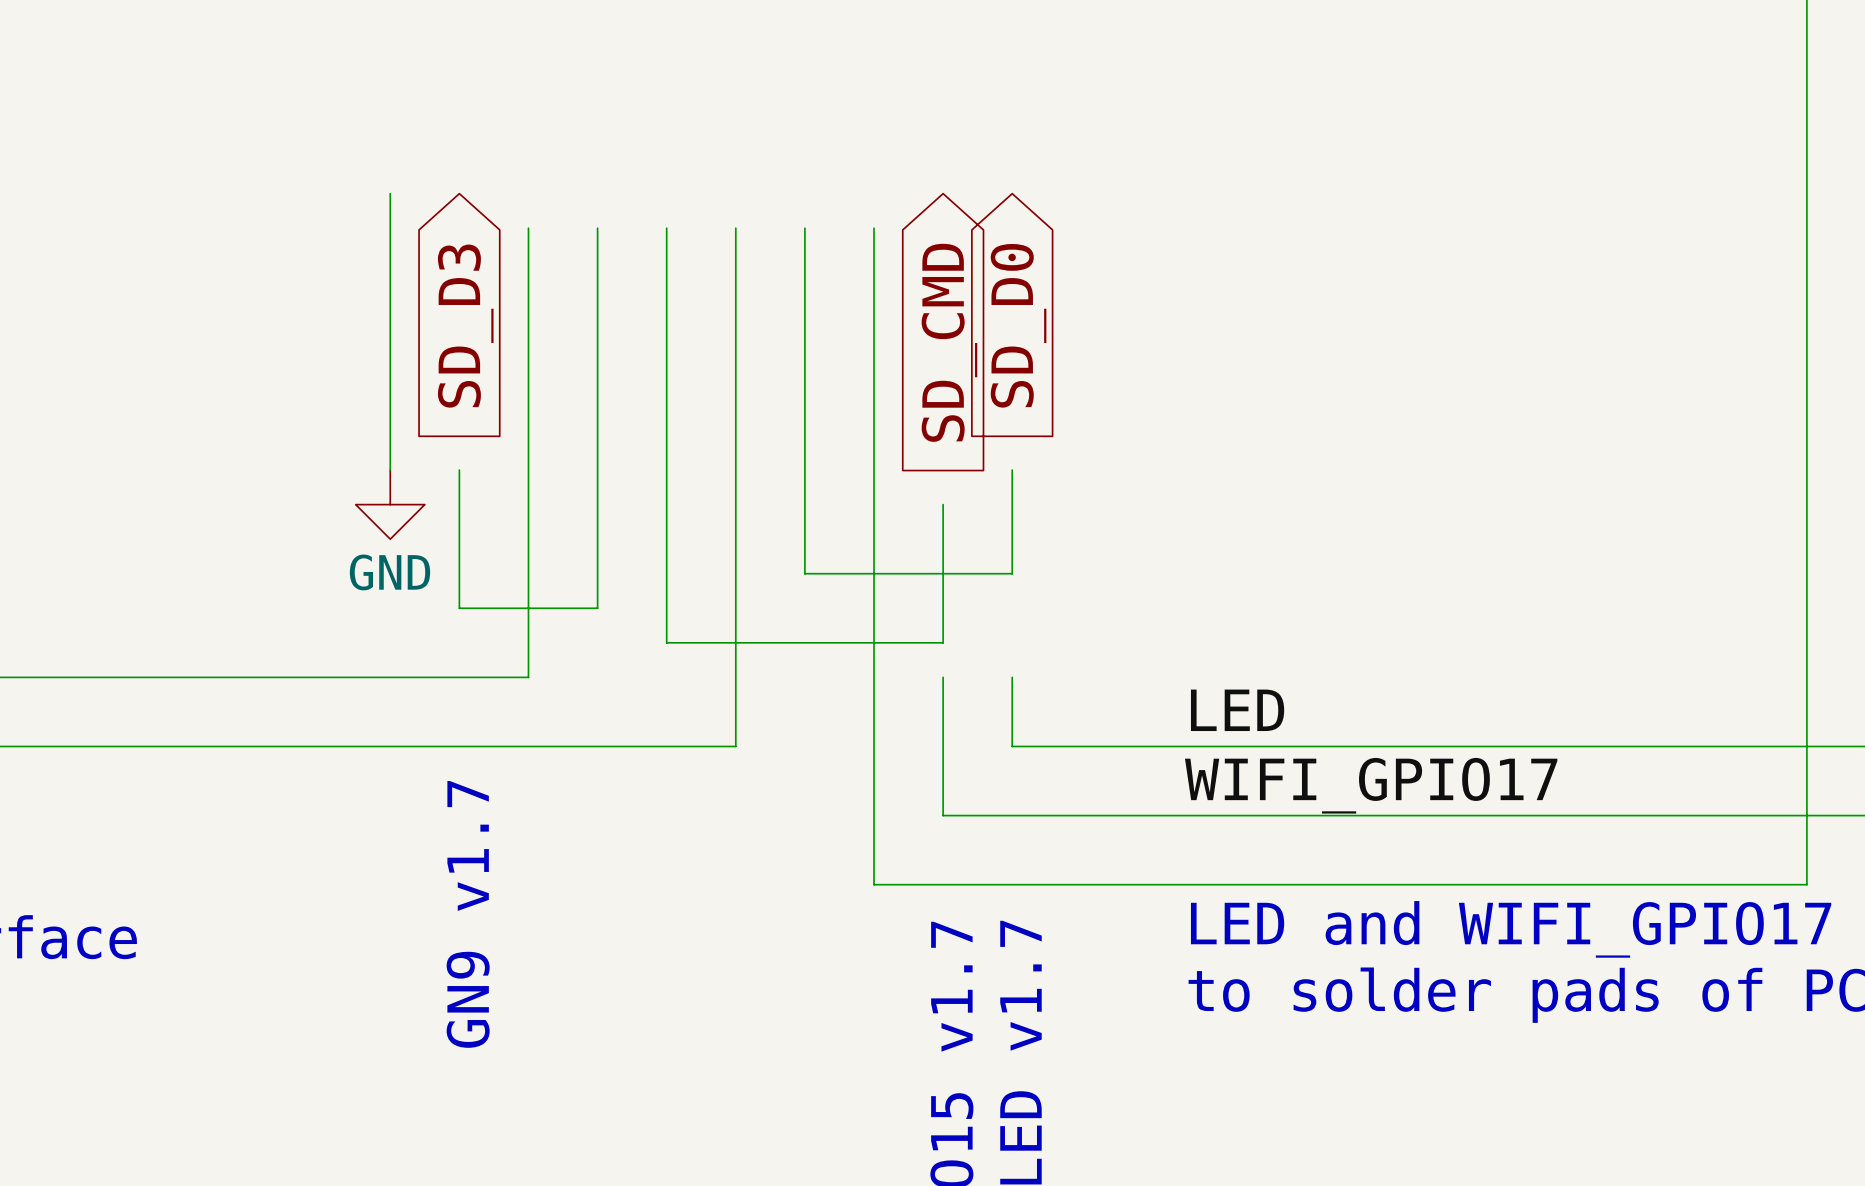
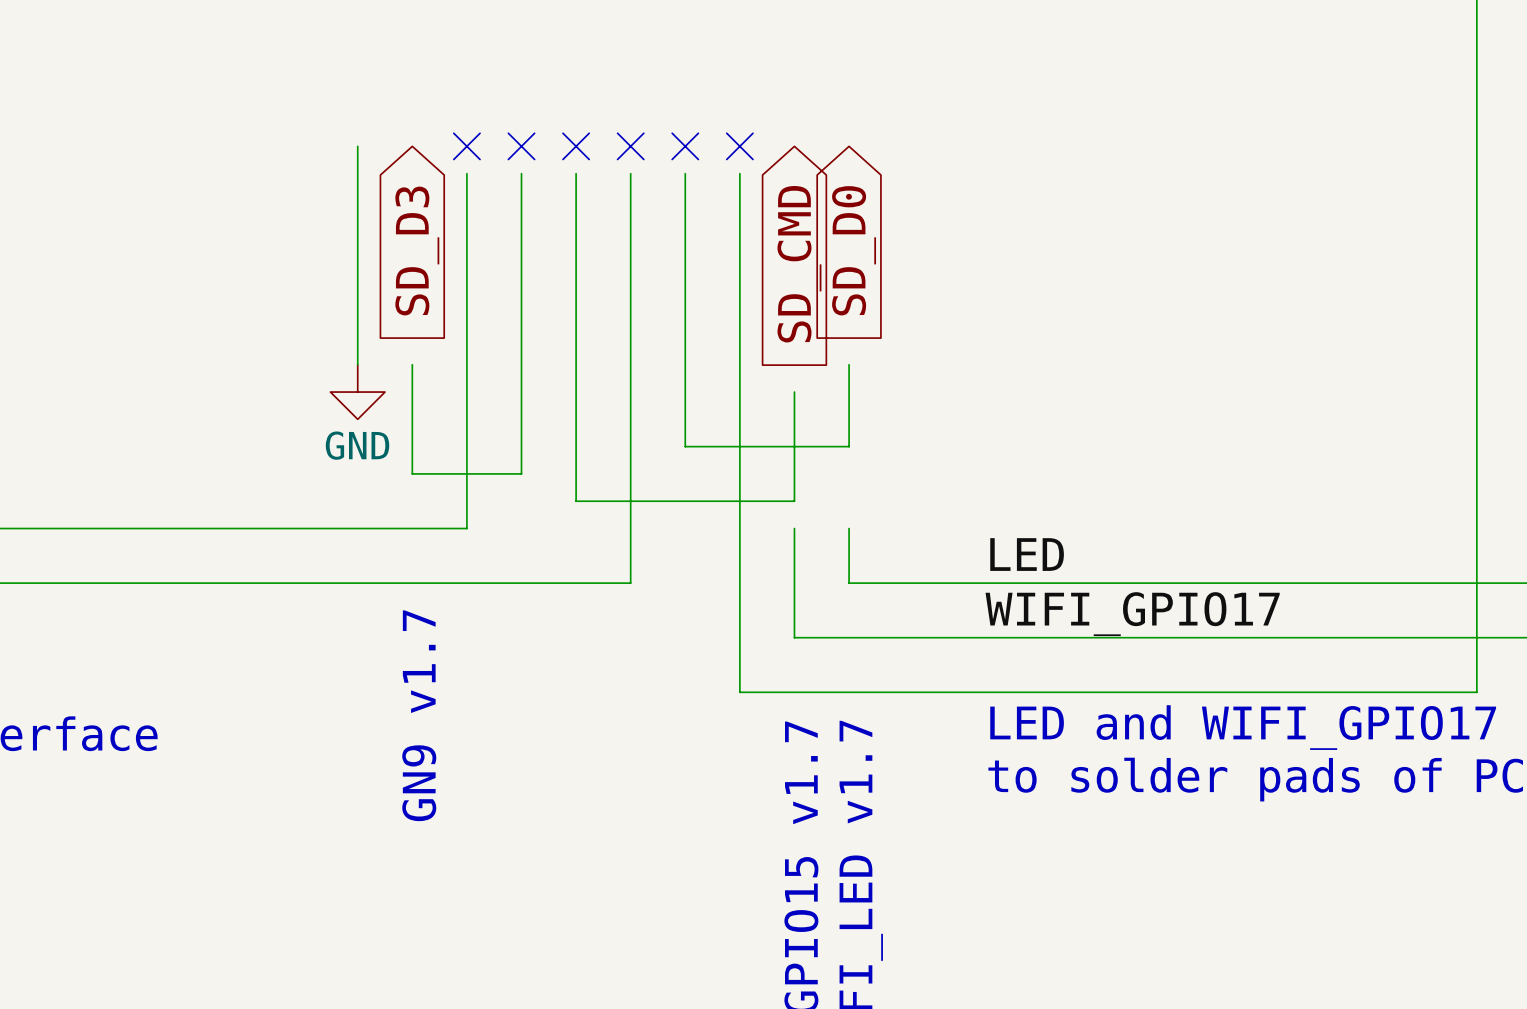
no-connect mark: none -> (466, 146)
no-connect mark: none -> (521, 146)
no-connect mark: none -> (576, 146)
no-connect mark: none -> (630, 146)
no-connect mark: none -> (685, 146)
no-connect mark: none -> (739, 146)

